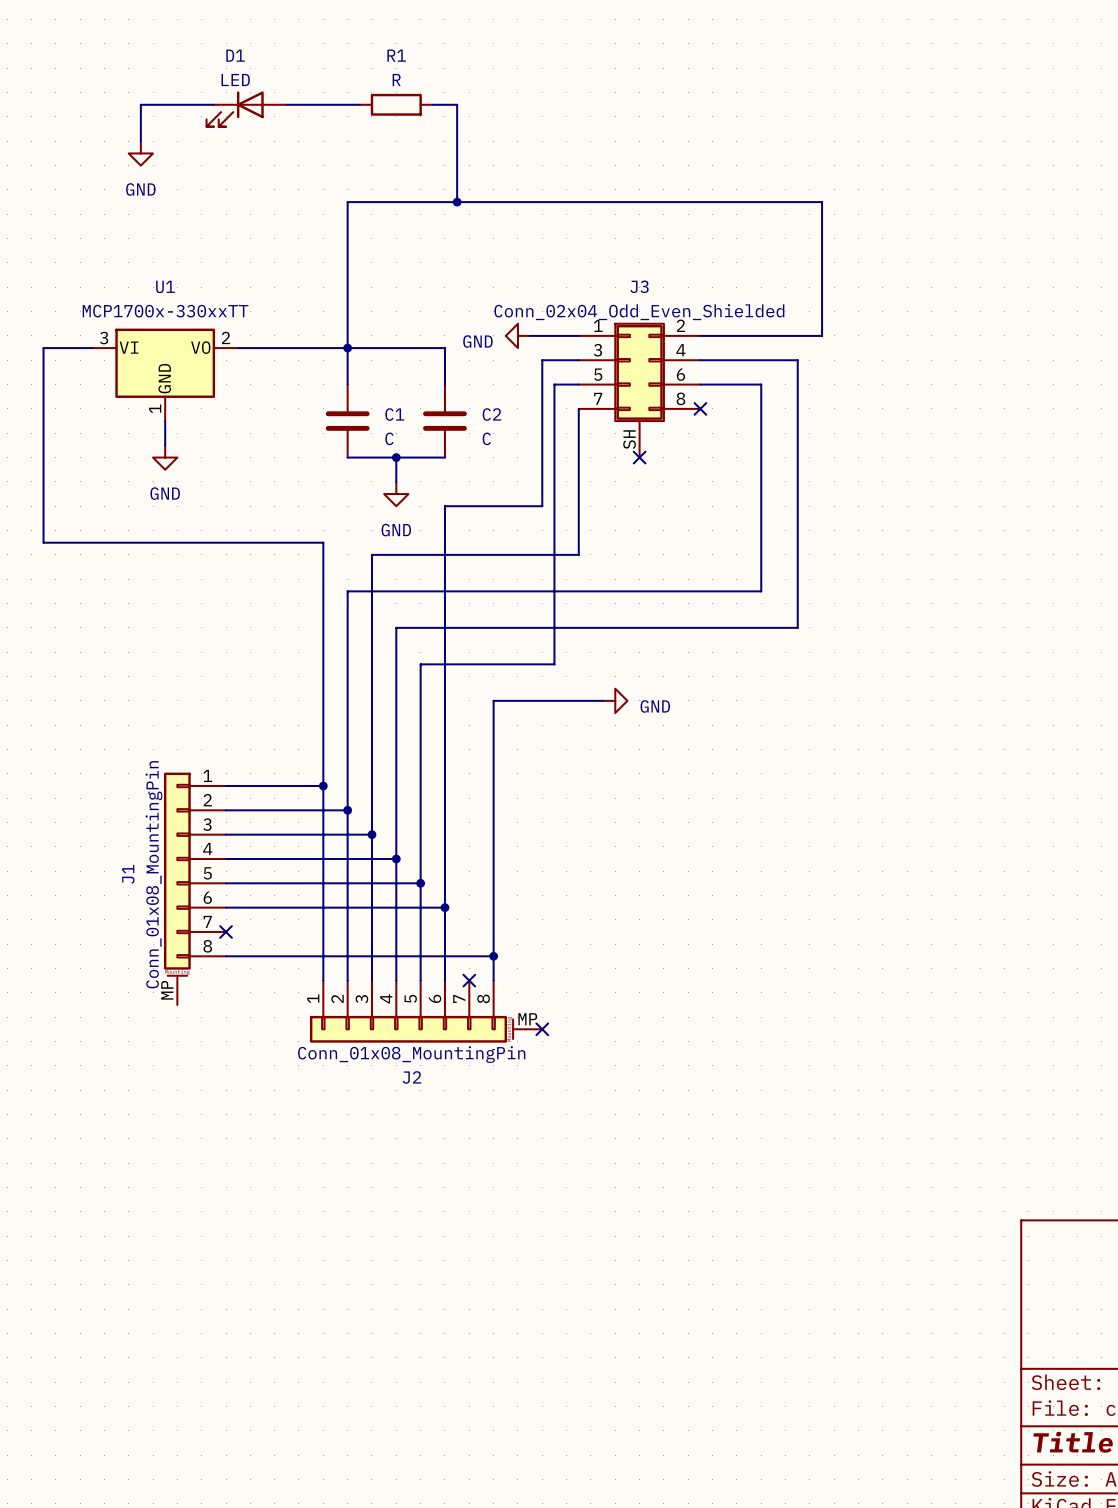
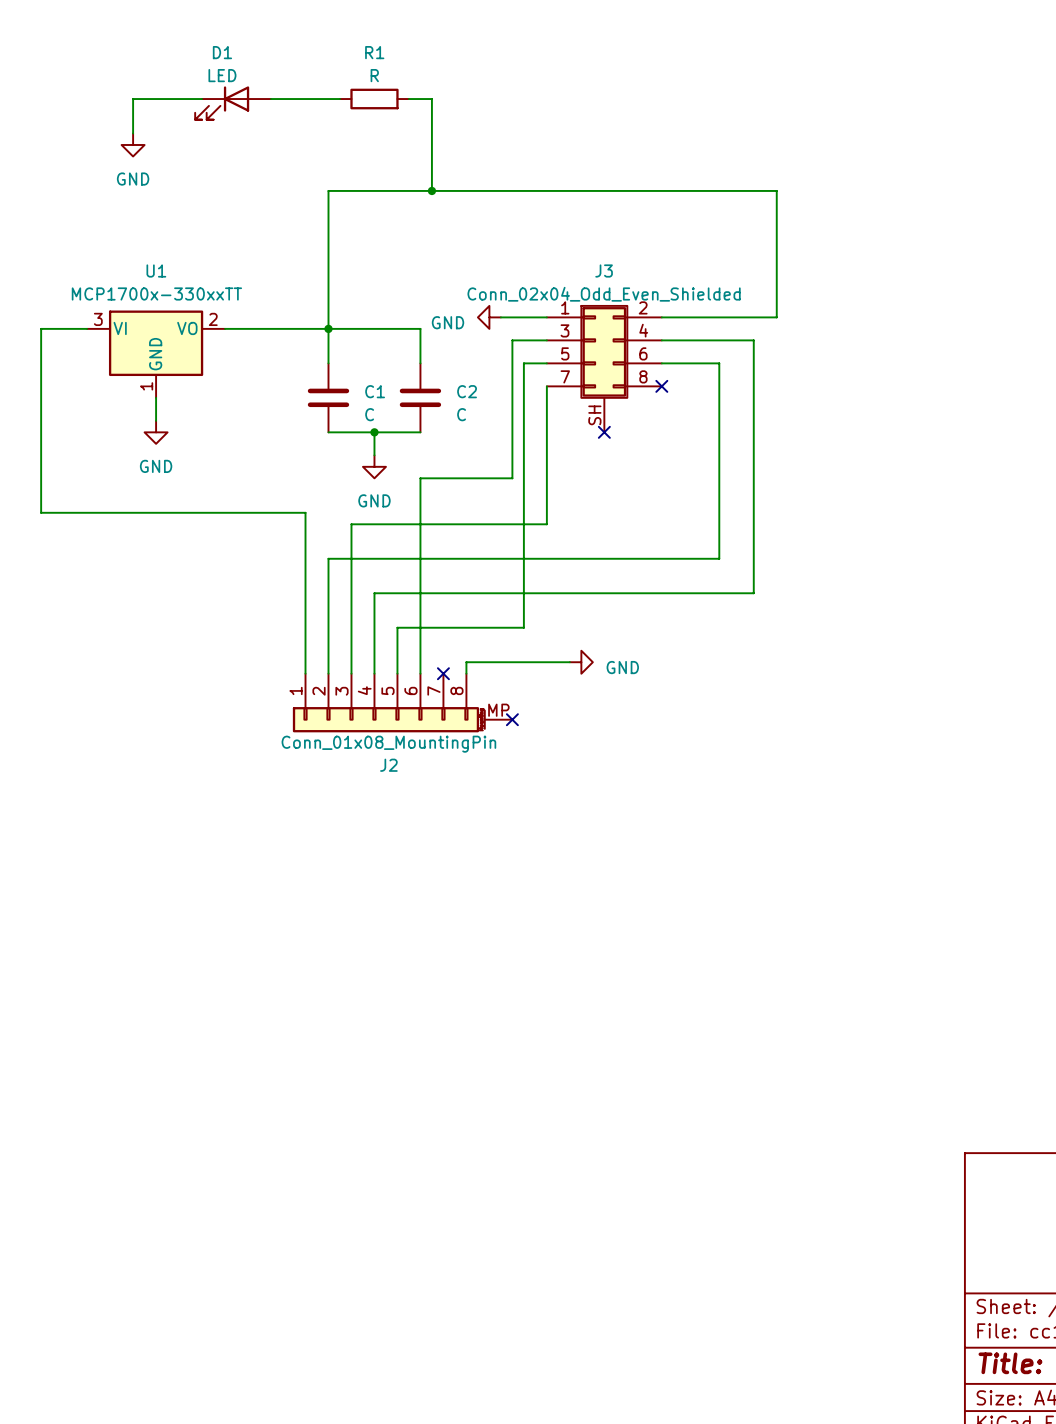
wire: (323, 713) (323, 980) -> none
wire: (347, 713) (347, 980) -> none
wire: (371, 713) (371, 980) -> none
wire: (396, 713) (396, 980) -> none
wire: (420, 713) (420, 980) -> none
wire: (444, 713) (444, 980) -> none
no-connect mark: none -> (443, 673)
wire: (493, 713) (493, 980) -> none
no-connect mark: none -> (512, 719)
wire: (226, 786) (323, 786) -> none
junction: (323, 786) -> none
wire: (226, 810) (347, 810) -> none
junction: (347, 810) -> none
wire: (226, 834) (371, 834) -> none
junction: (371, 834) -> none
wire: (226, 858) (396, 858) -> none
junction: (396, 858) -> none
wire: (226, 883) (420, 883) -> none
junction: (420, 883) -> none
J1: Conn_01x08_MountingPin (194, 888) -> none
wire: (226, 907) (444, 907) -> none
junction: (444, 907) -> none
no-connect mark: (226, 931) -> none
wire: (226, 956) (493, 956) -> none
junction: (493, 956) -> none
no-connect mark: (469, 980) -> none
J2 position: (426, 1011) -> (402, 703)
no-connect mark: (542, 1029) -> none

